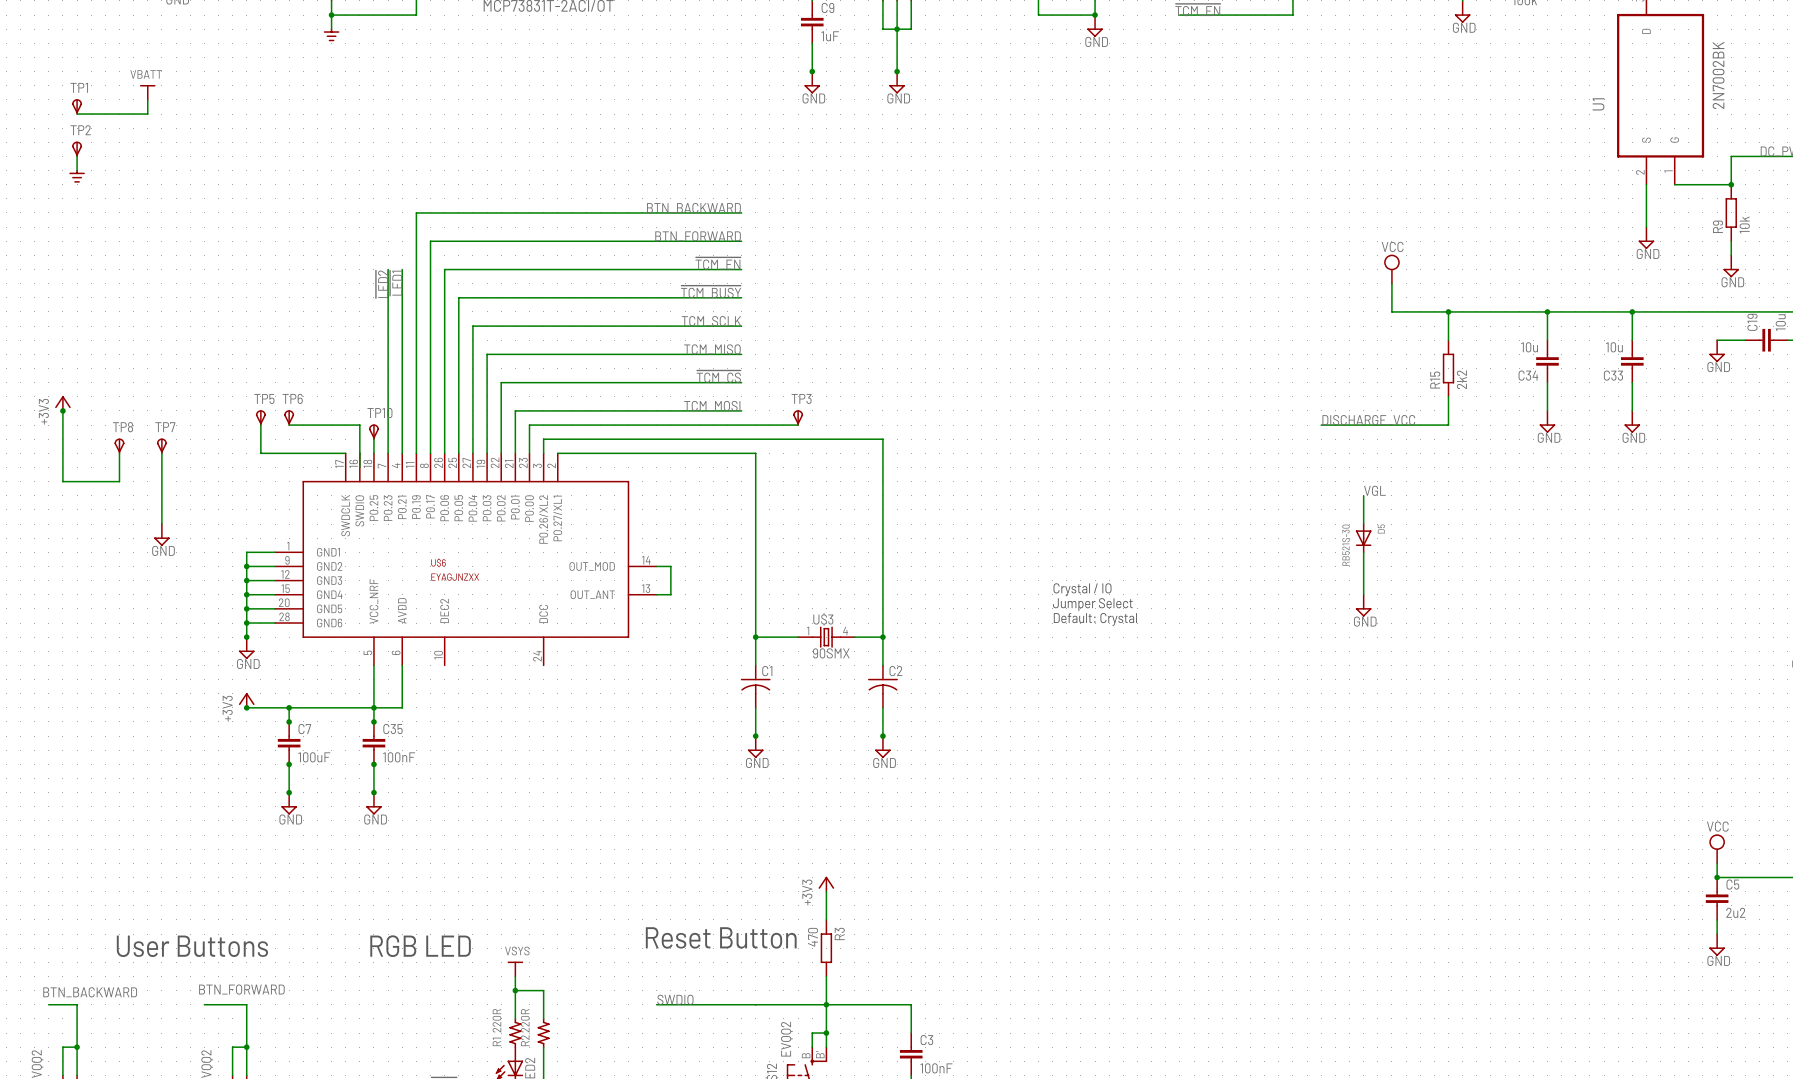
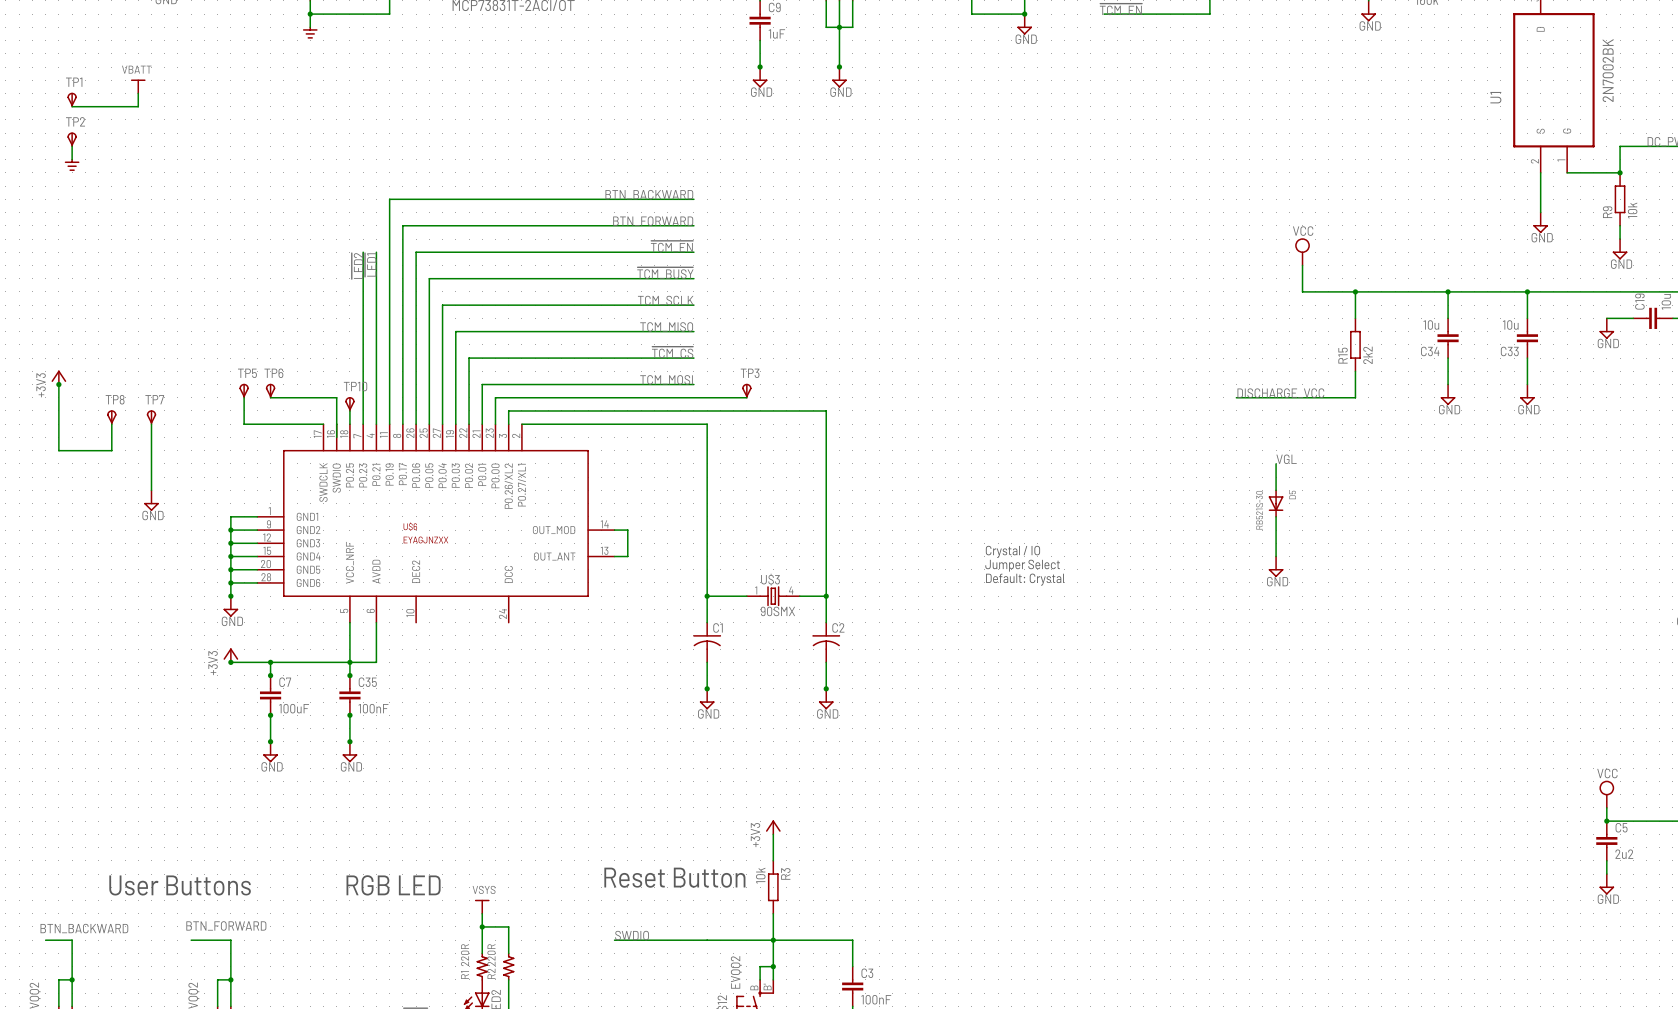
R3 value: 470 (812, 937) -> 10k (760, 875)

